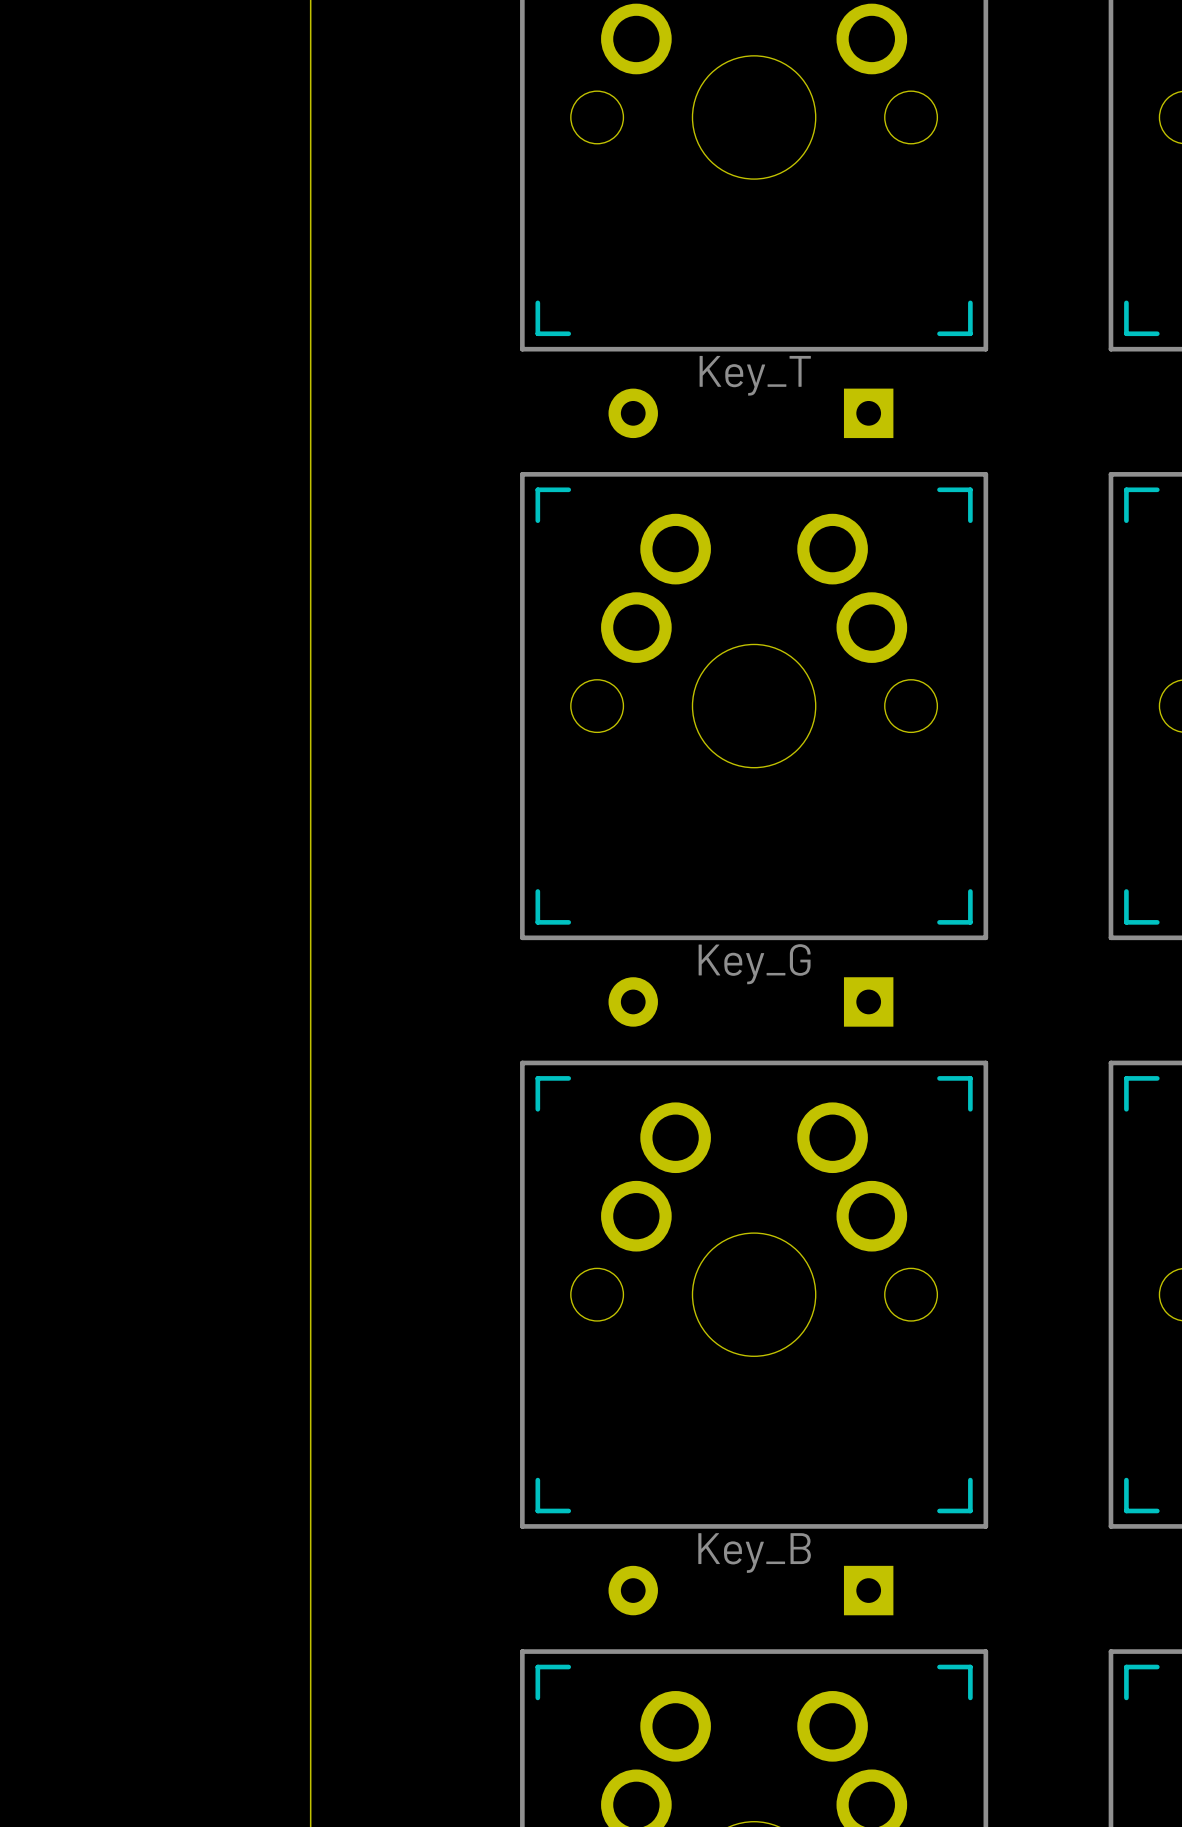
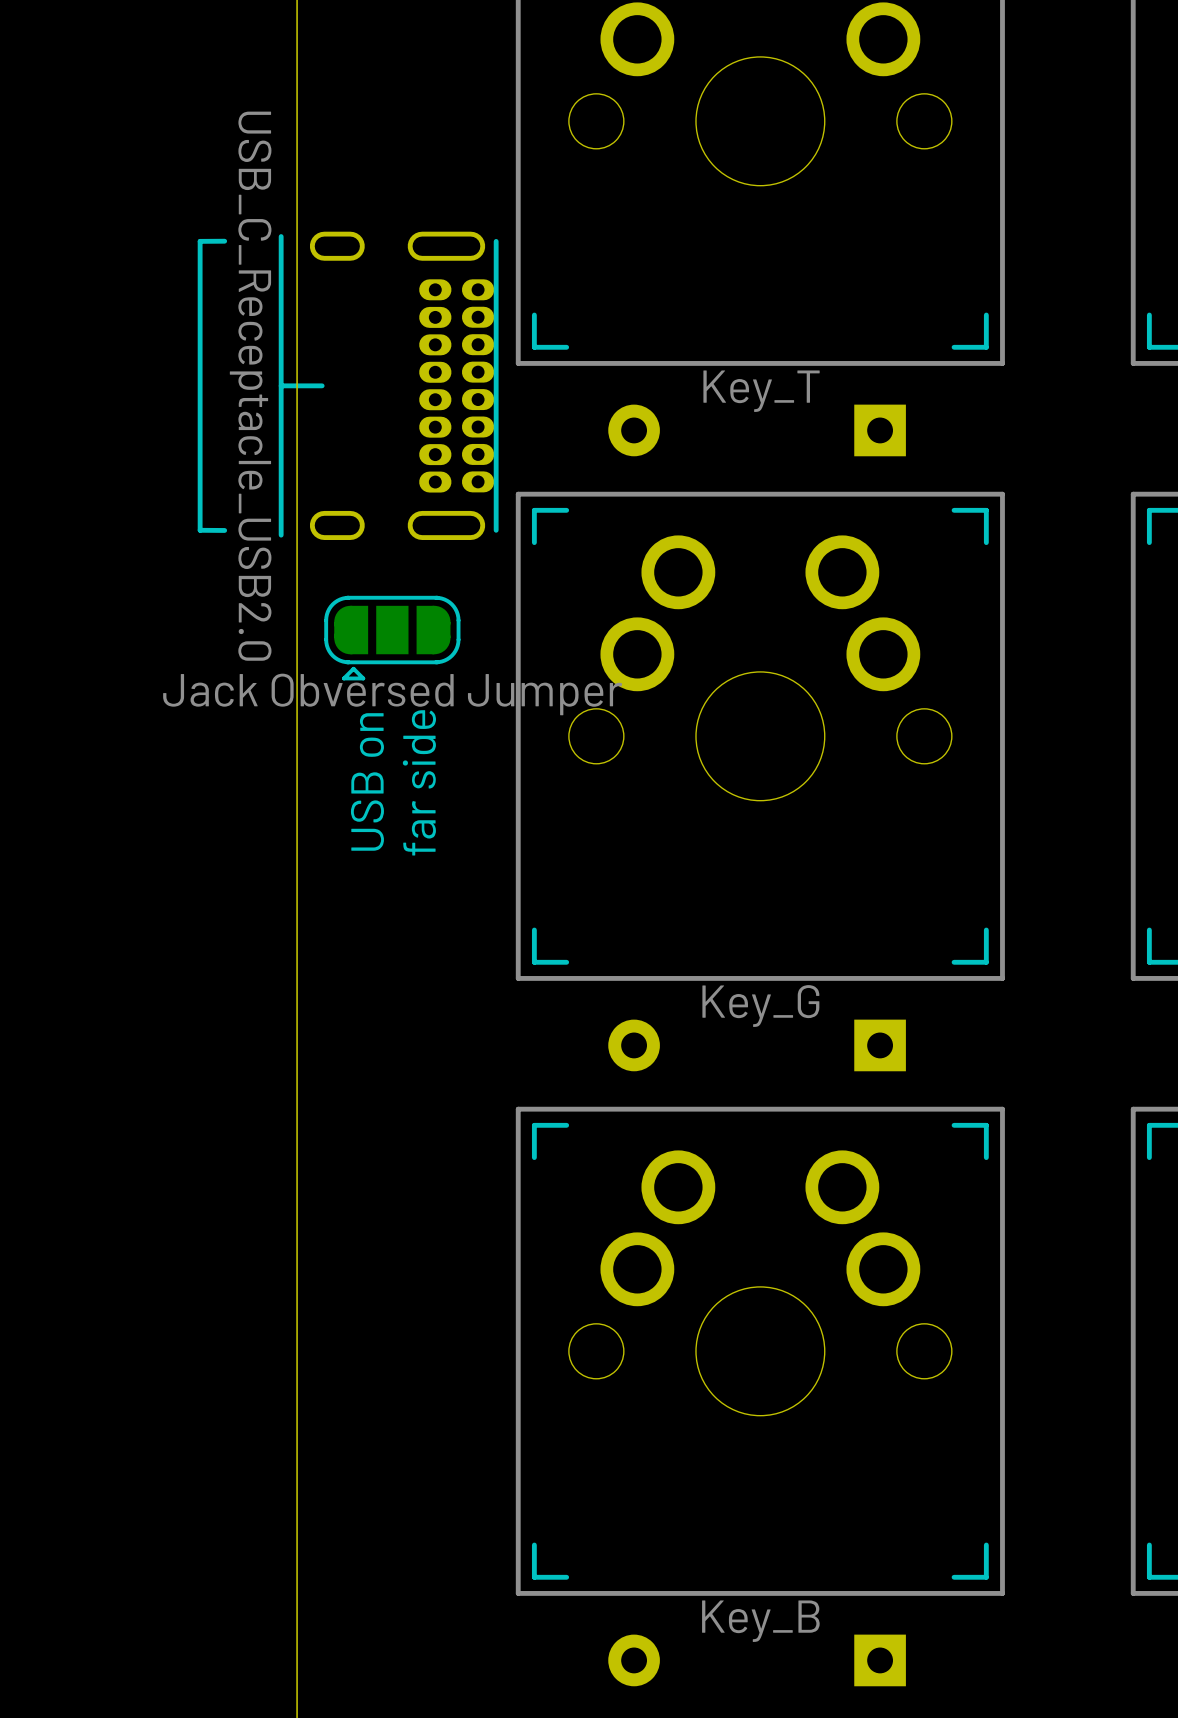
part: none -> USB_C_Receptacle_USB2.0 (348, 385)
part: none -> Jack Obversed Jumper (392, 638)
text: none -> USB on (367, 781)
text: none -> far side (419, 782)

